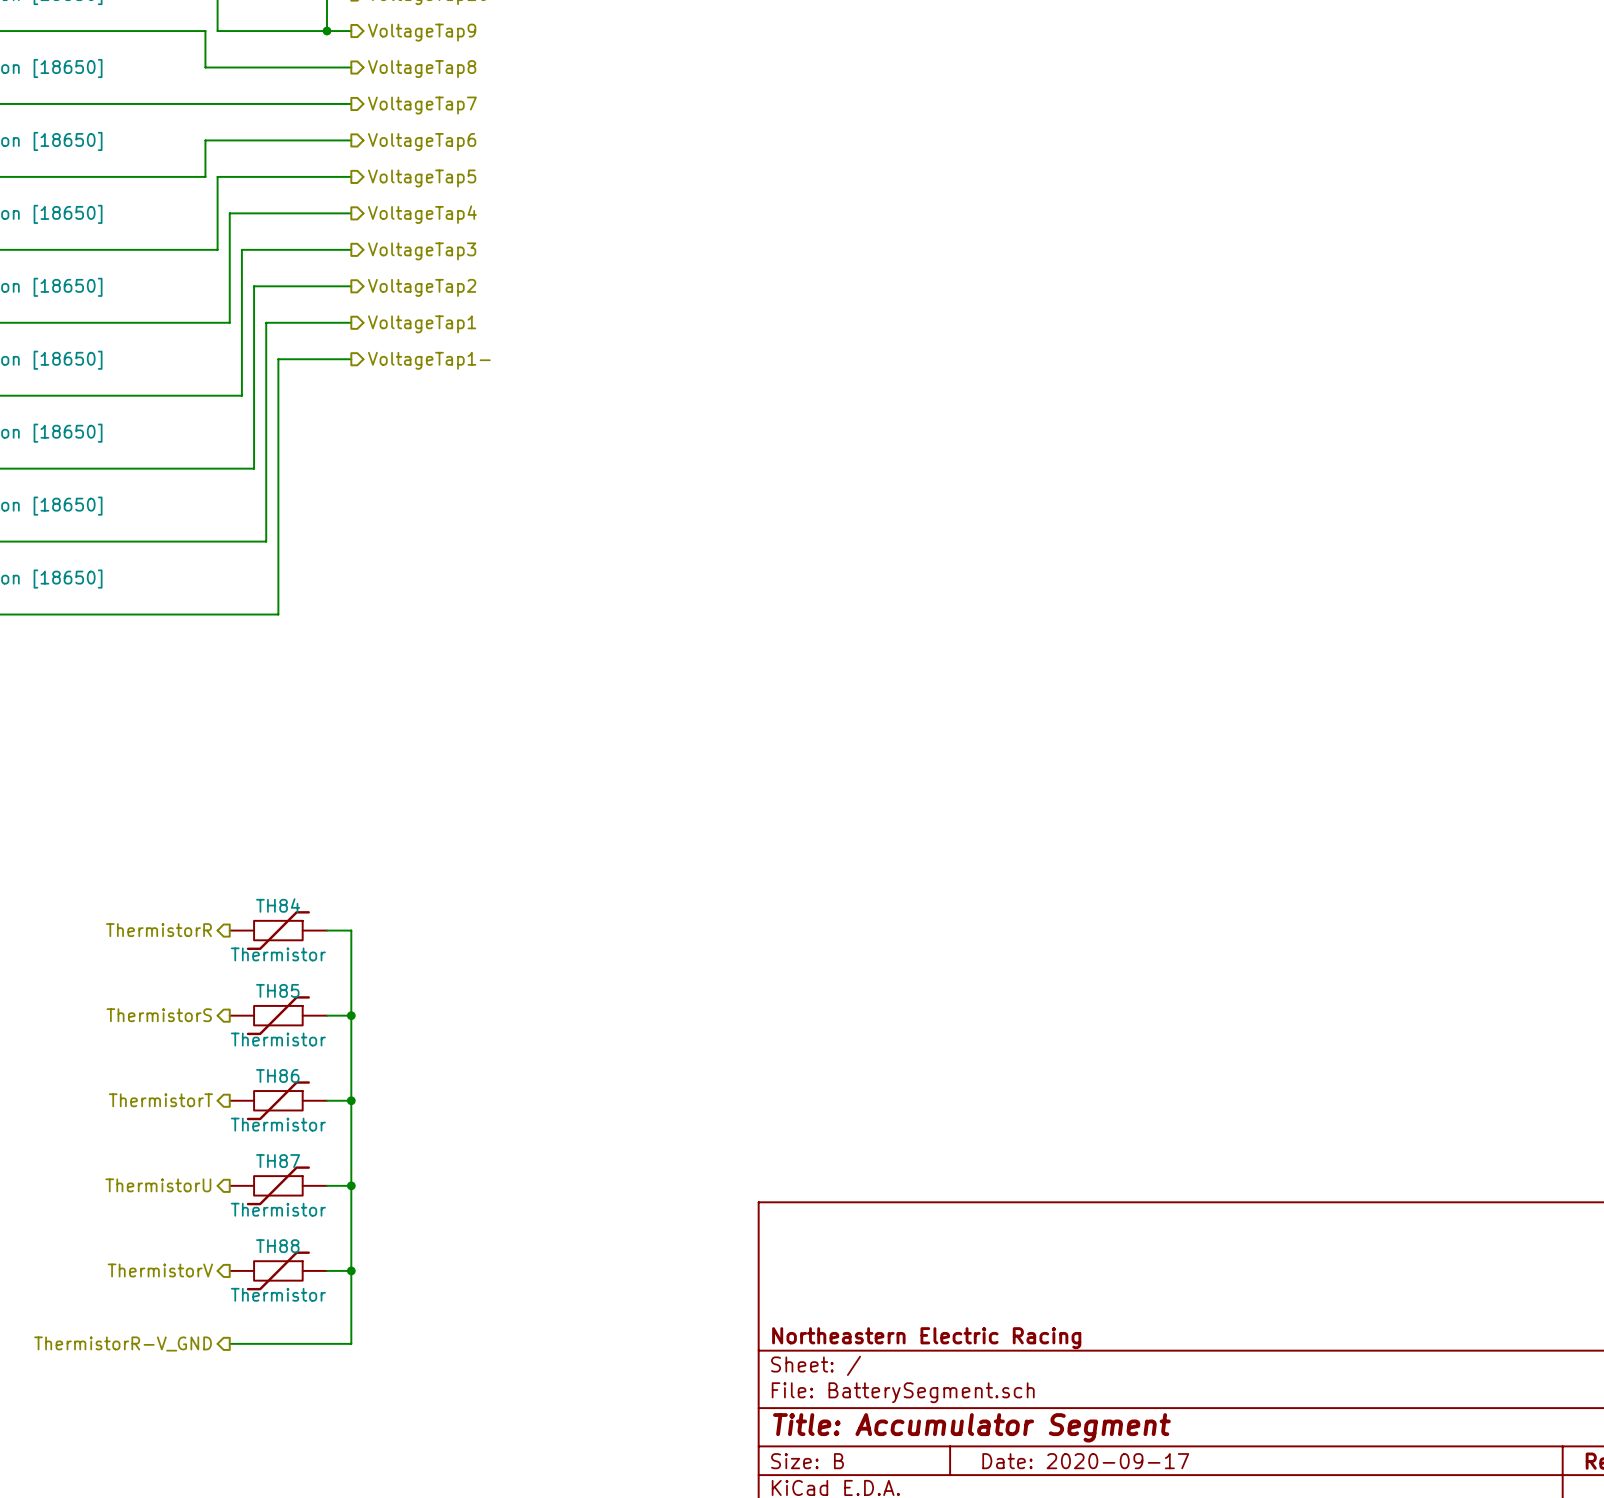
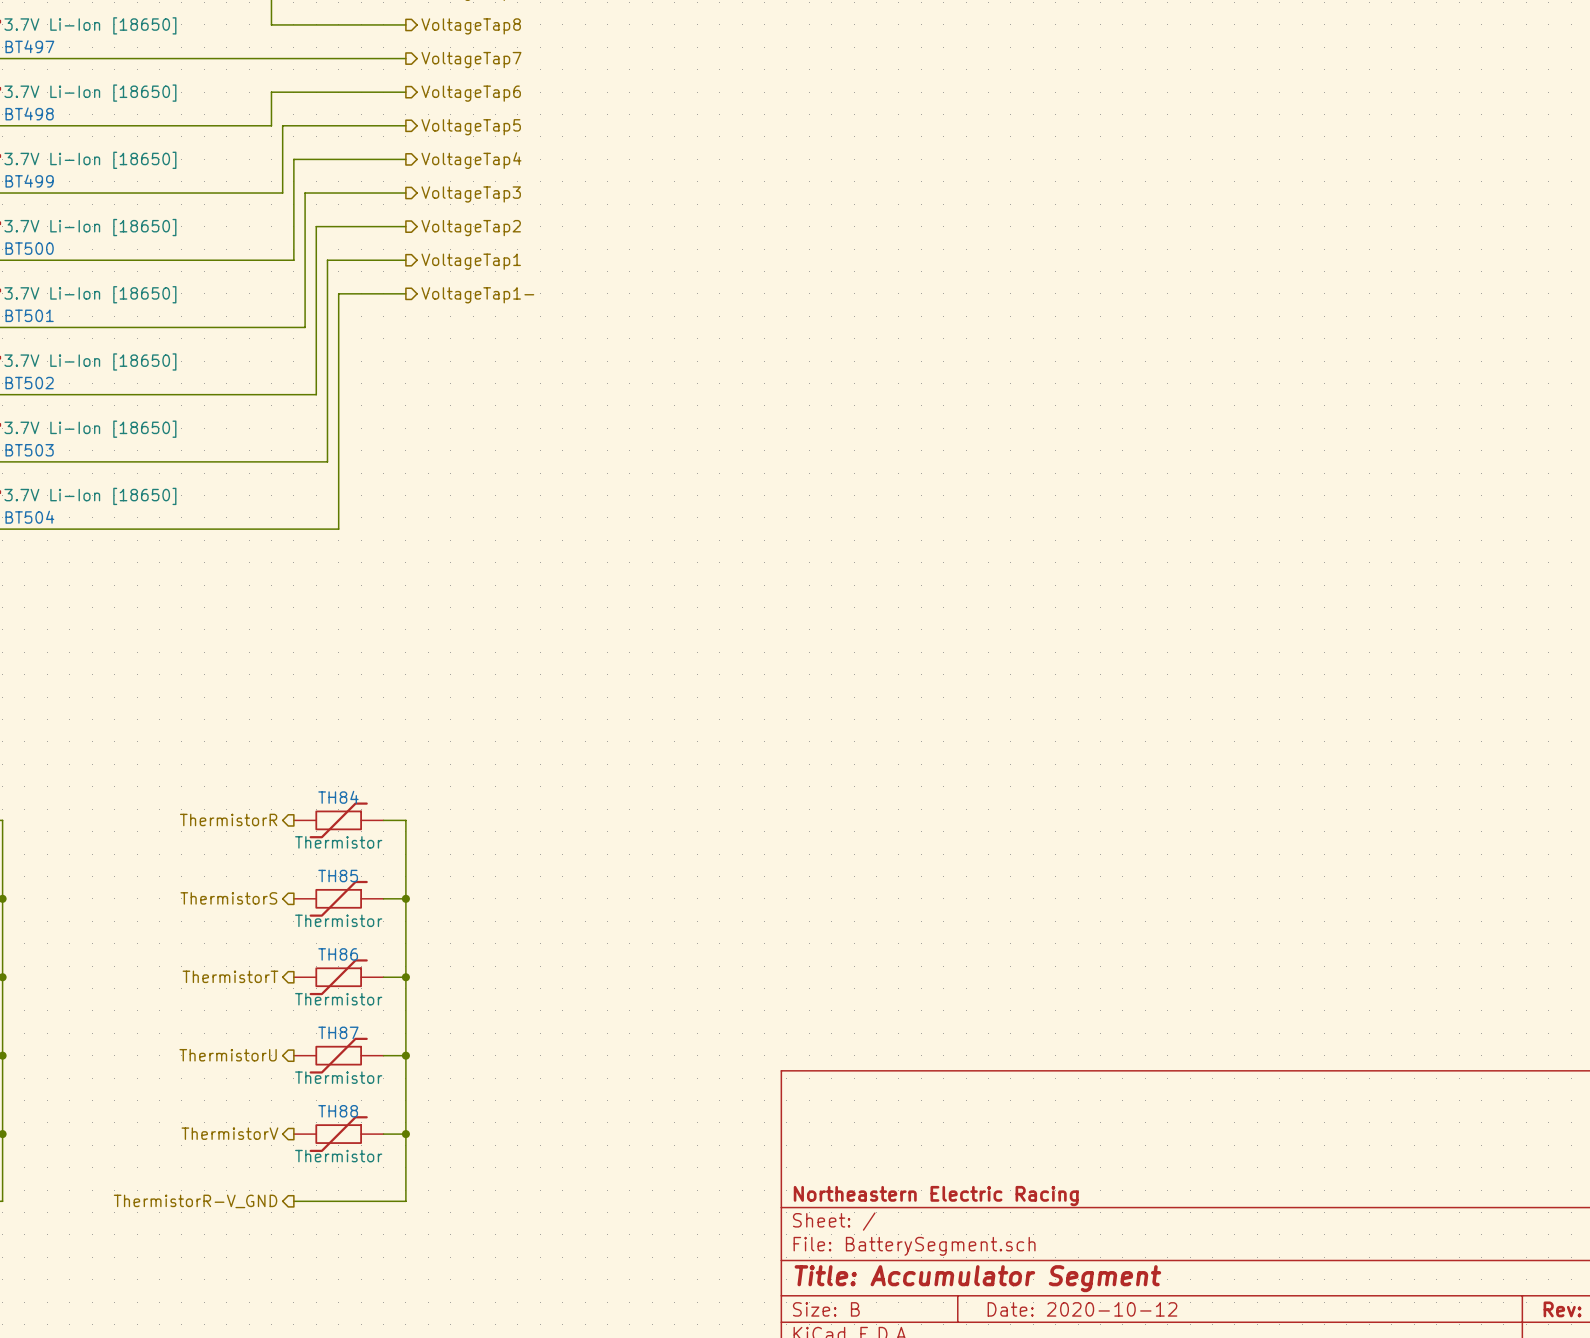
title block: Date: 2020-09-17 (1085, 1461) -> Date: 2020-10-12 (1082, 1309)

